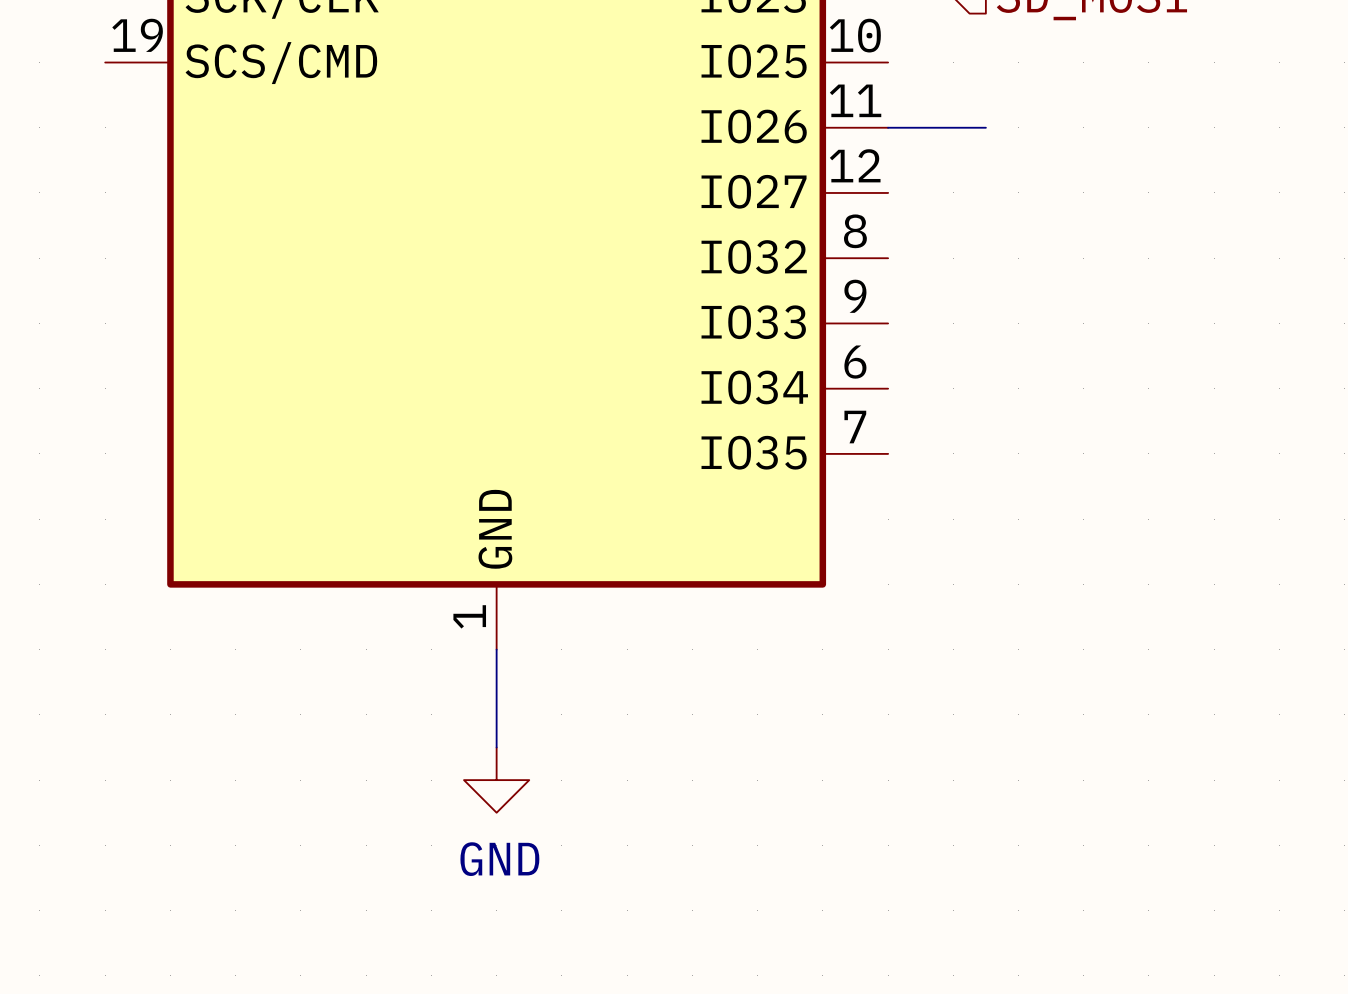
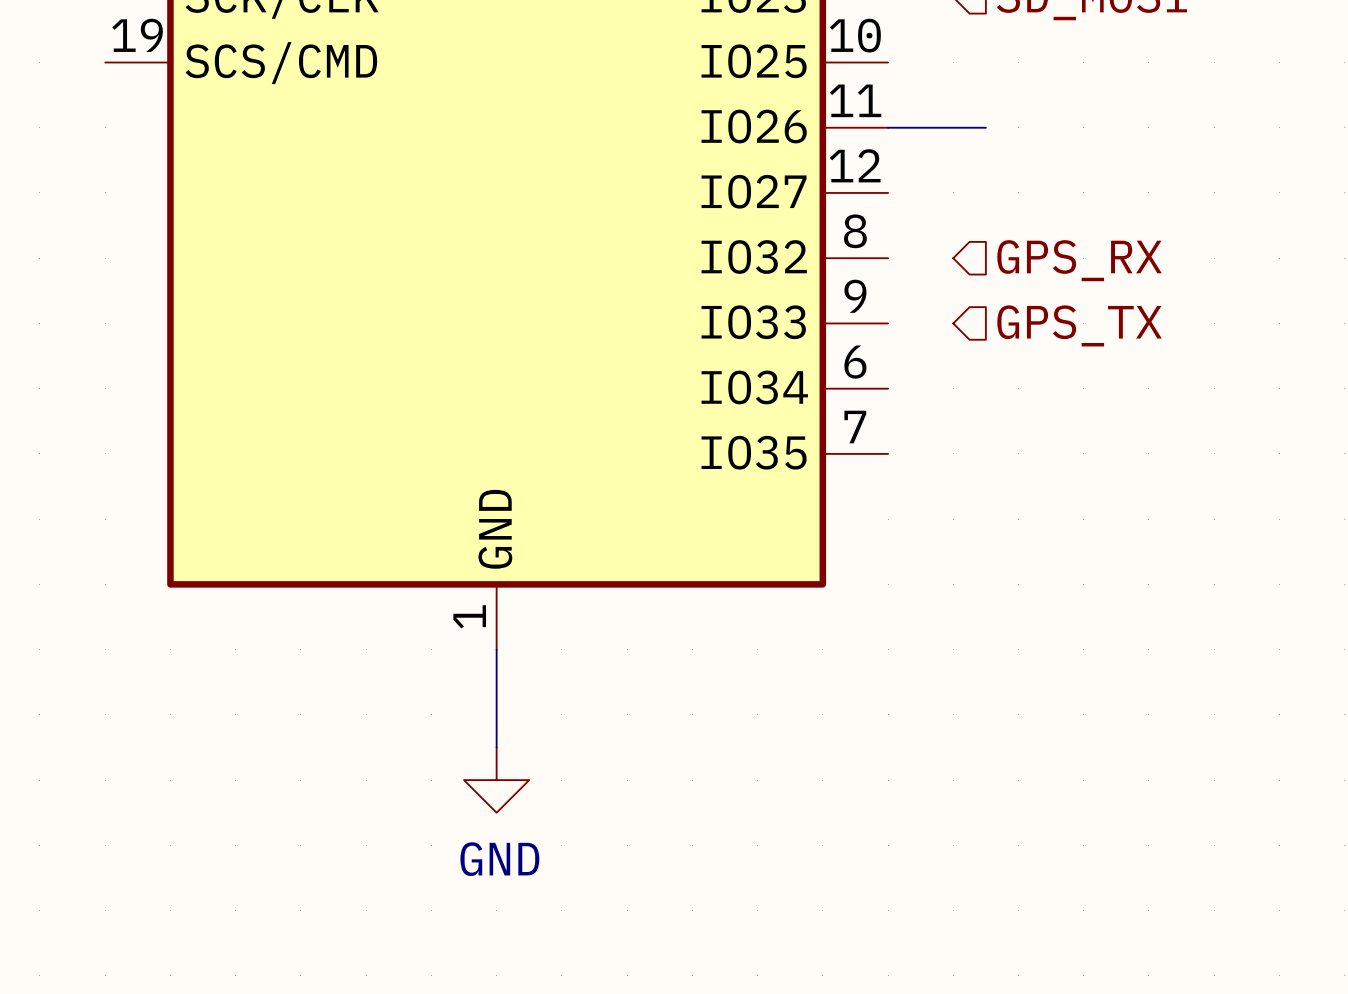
hierarchical label: none -> GPS_RX (1079, 260)
hierarchical label: none -> GPS_TX (1079, 325)

